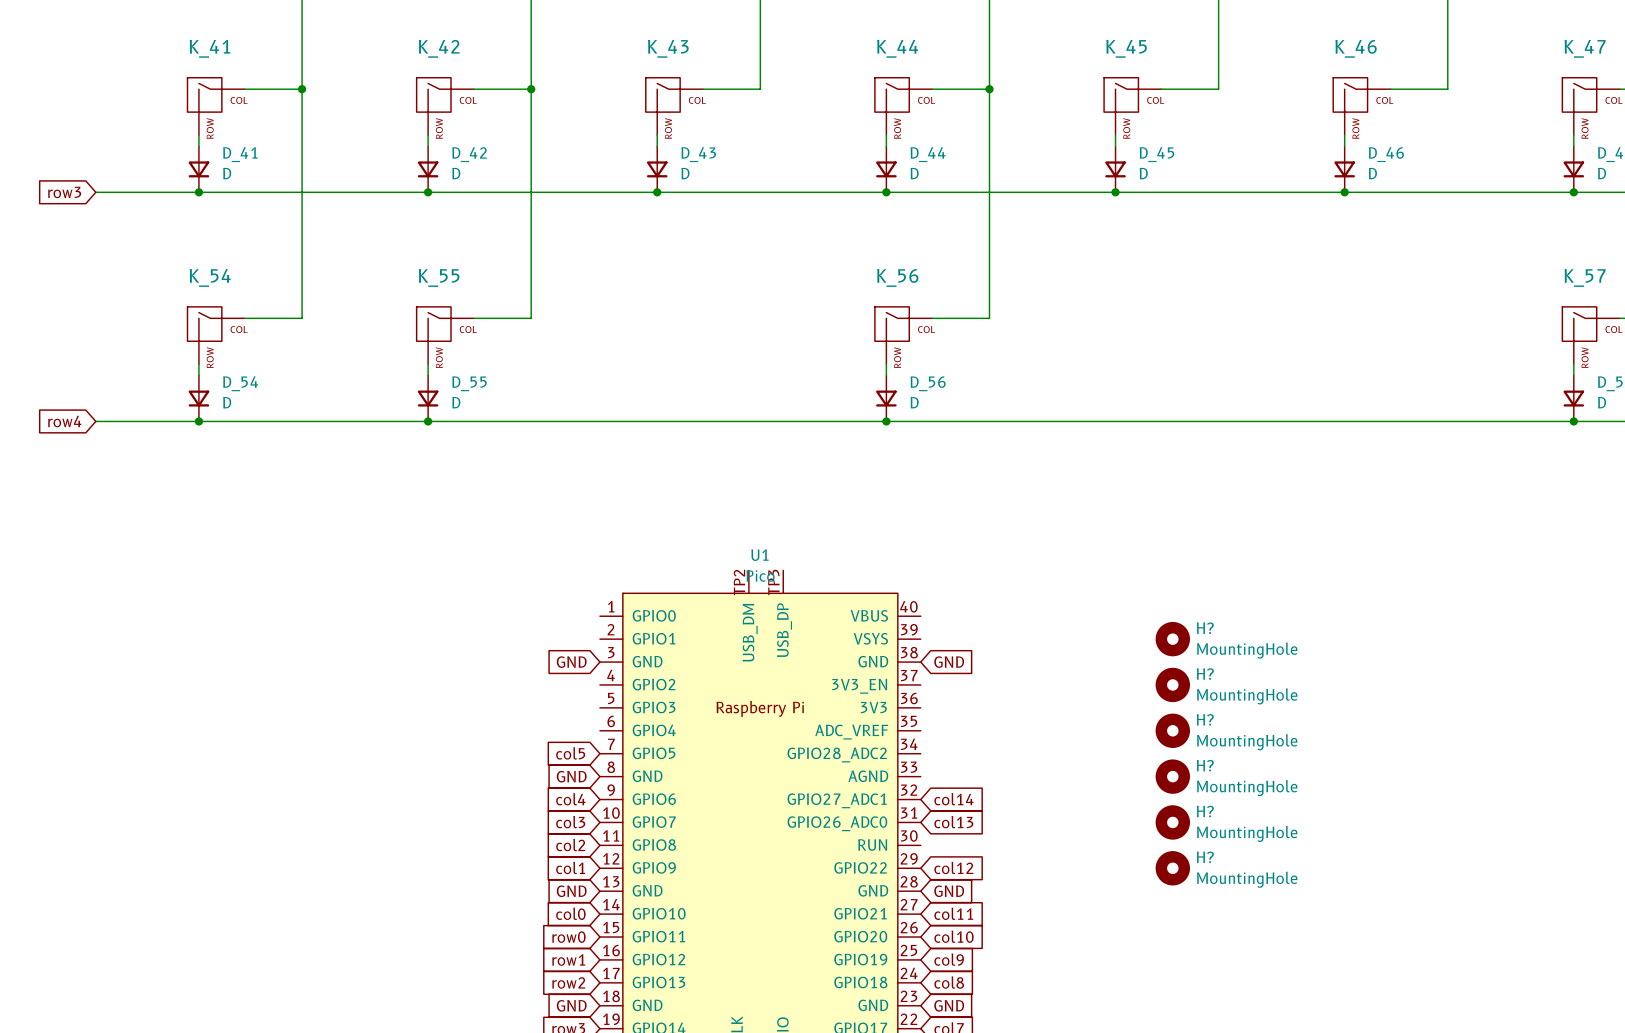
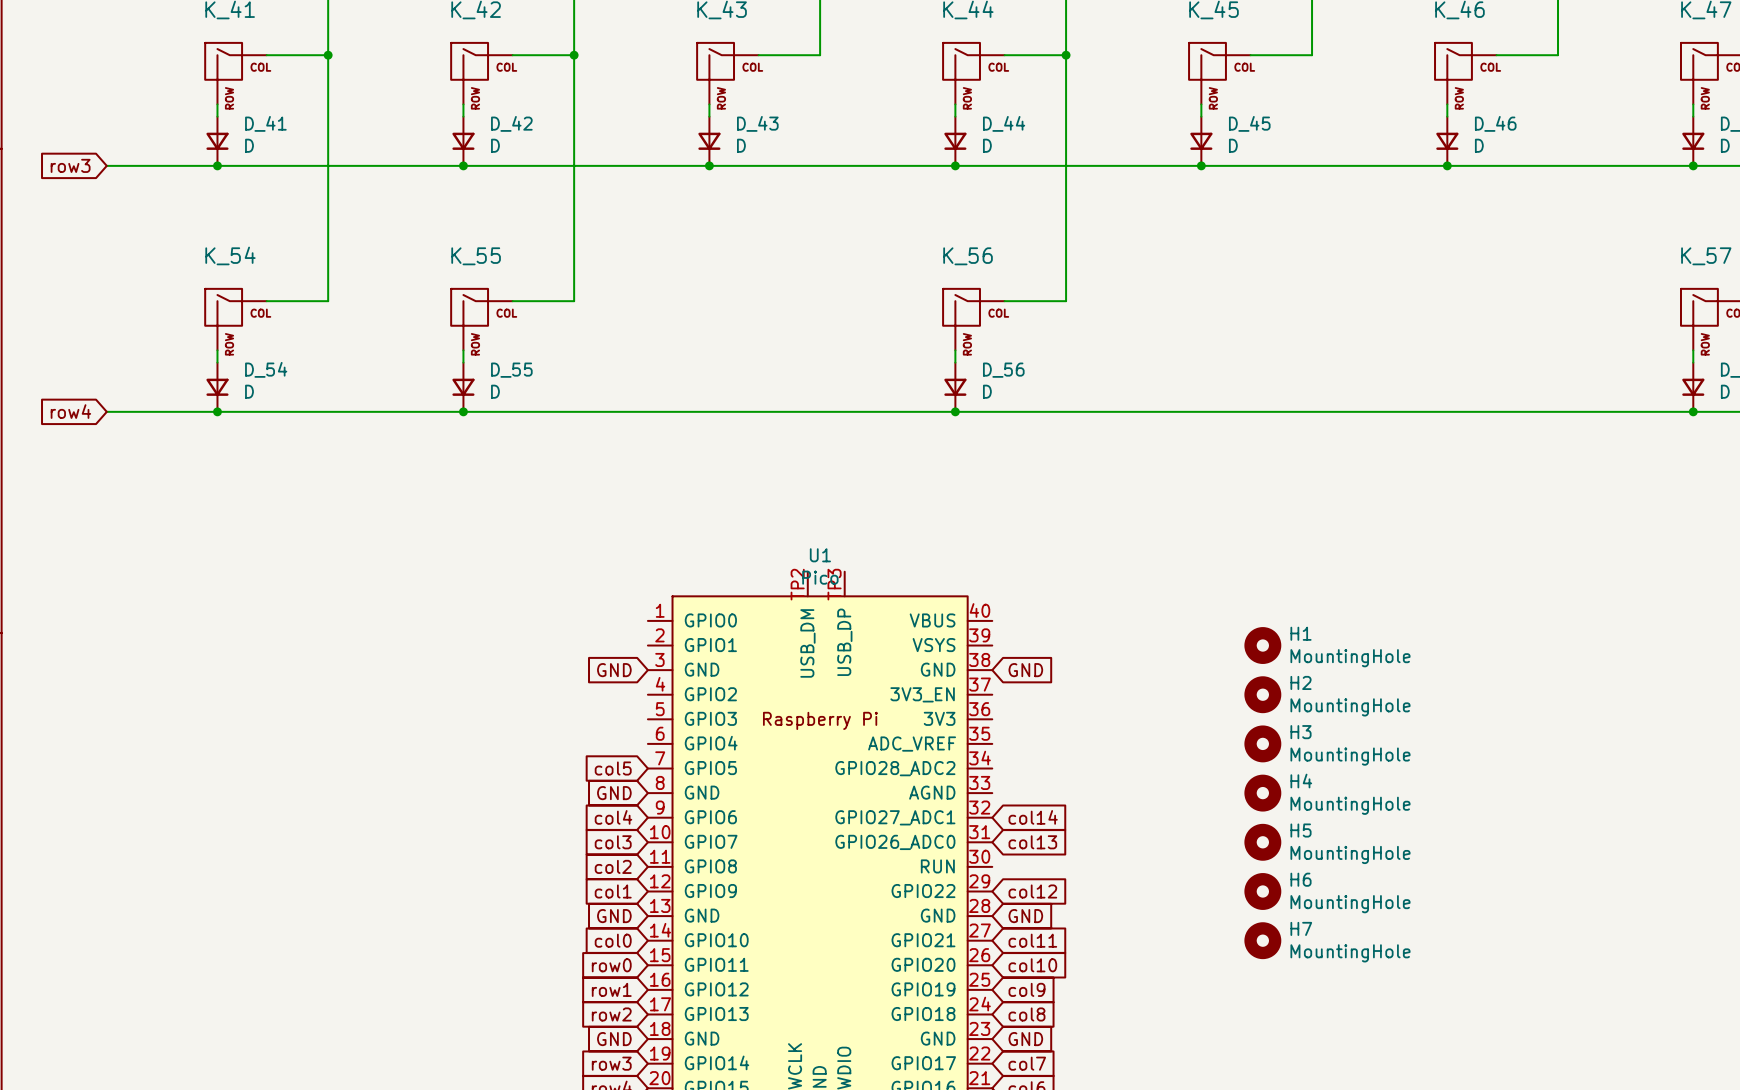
H? name: H? (1205, 628) -> H1 (1301, 633)
H? name: H? (1205, 674) -> H2 (1301, 682)
H? name: H? (1205, 719) -> H3 (1301, 732)
H? name: H? (1205, 765) -> H4 (1301, 781)
H? name: H? (1205, 811) -> H5 (1301, 830)
H? name: H? (1205, 857) -> H6 (1301, 879)
H7: none -> MountingHole (1262, 940)

